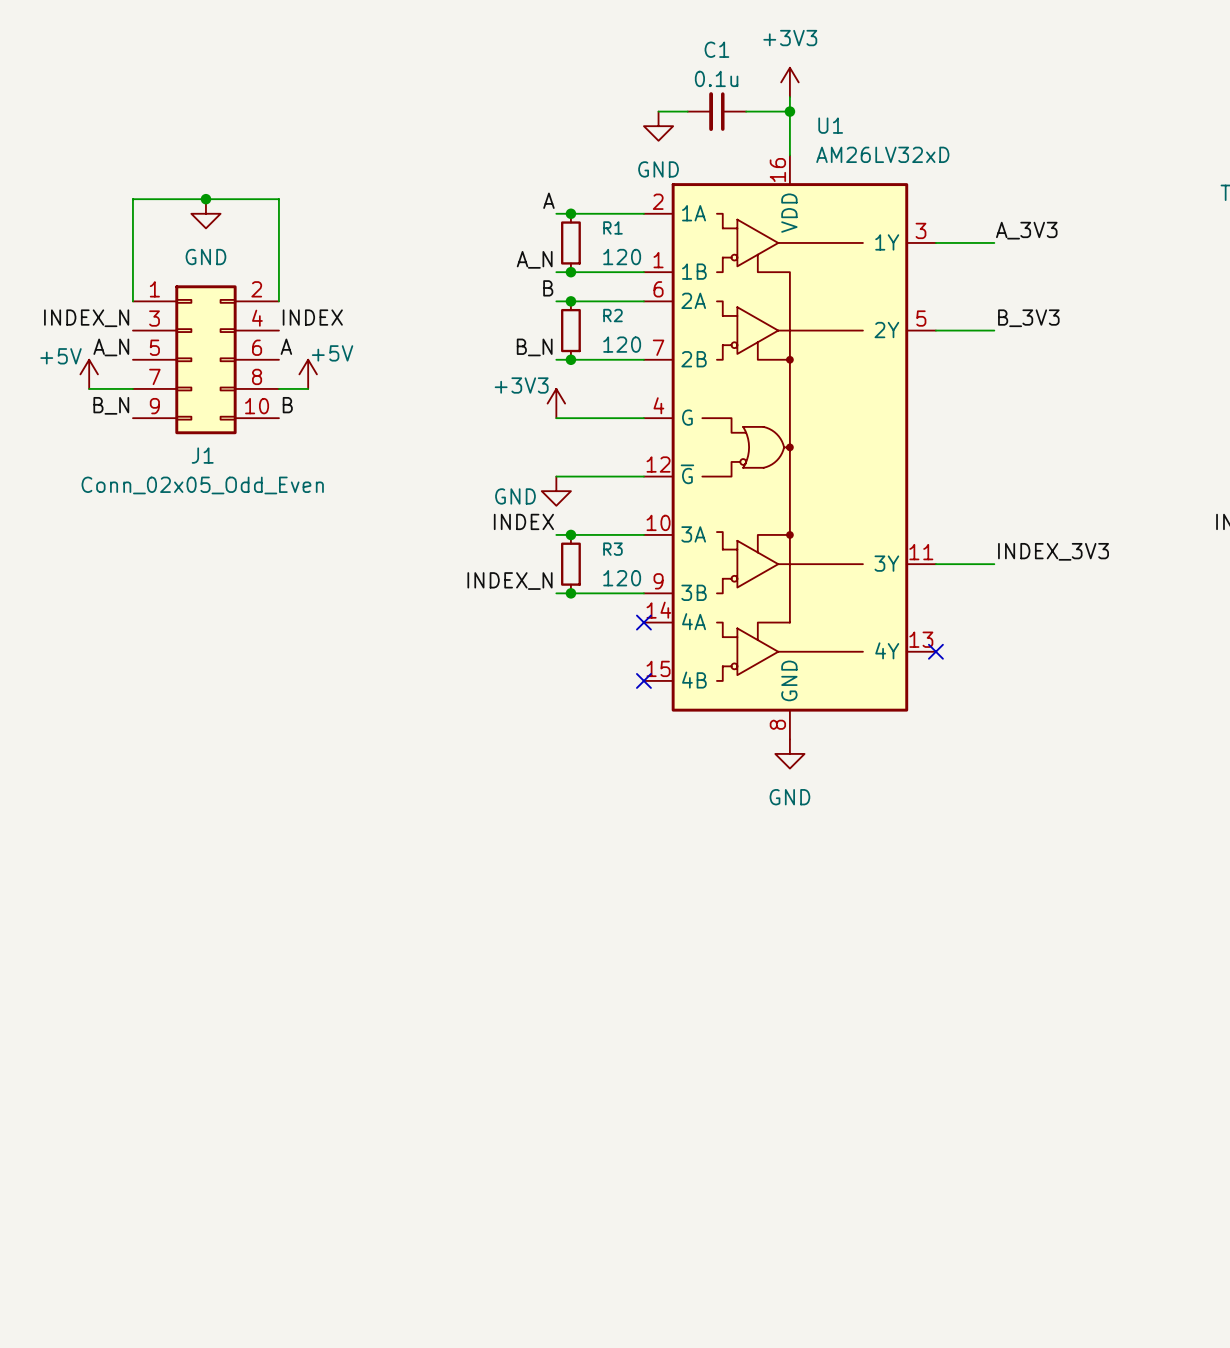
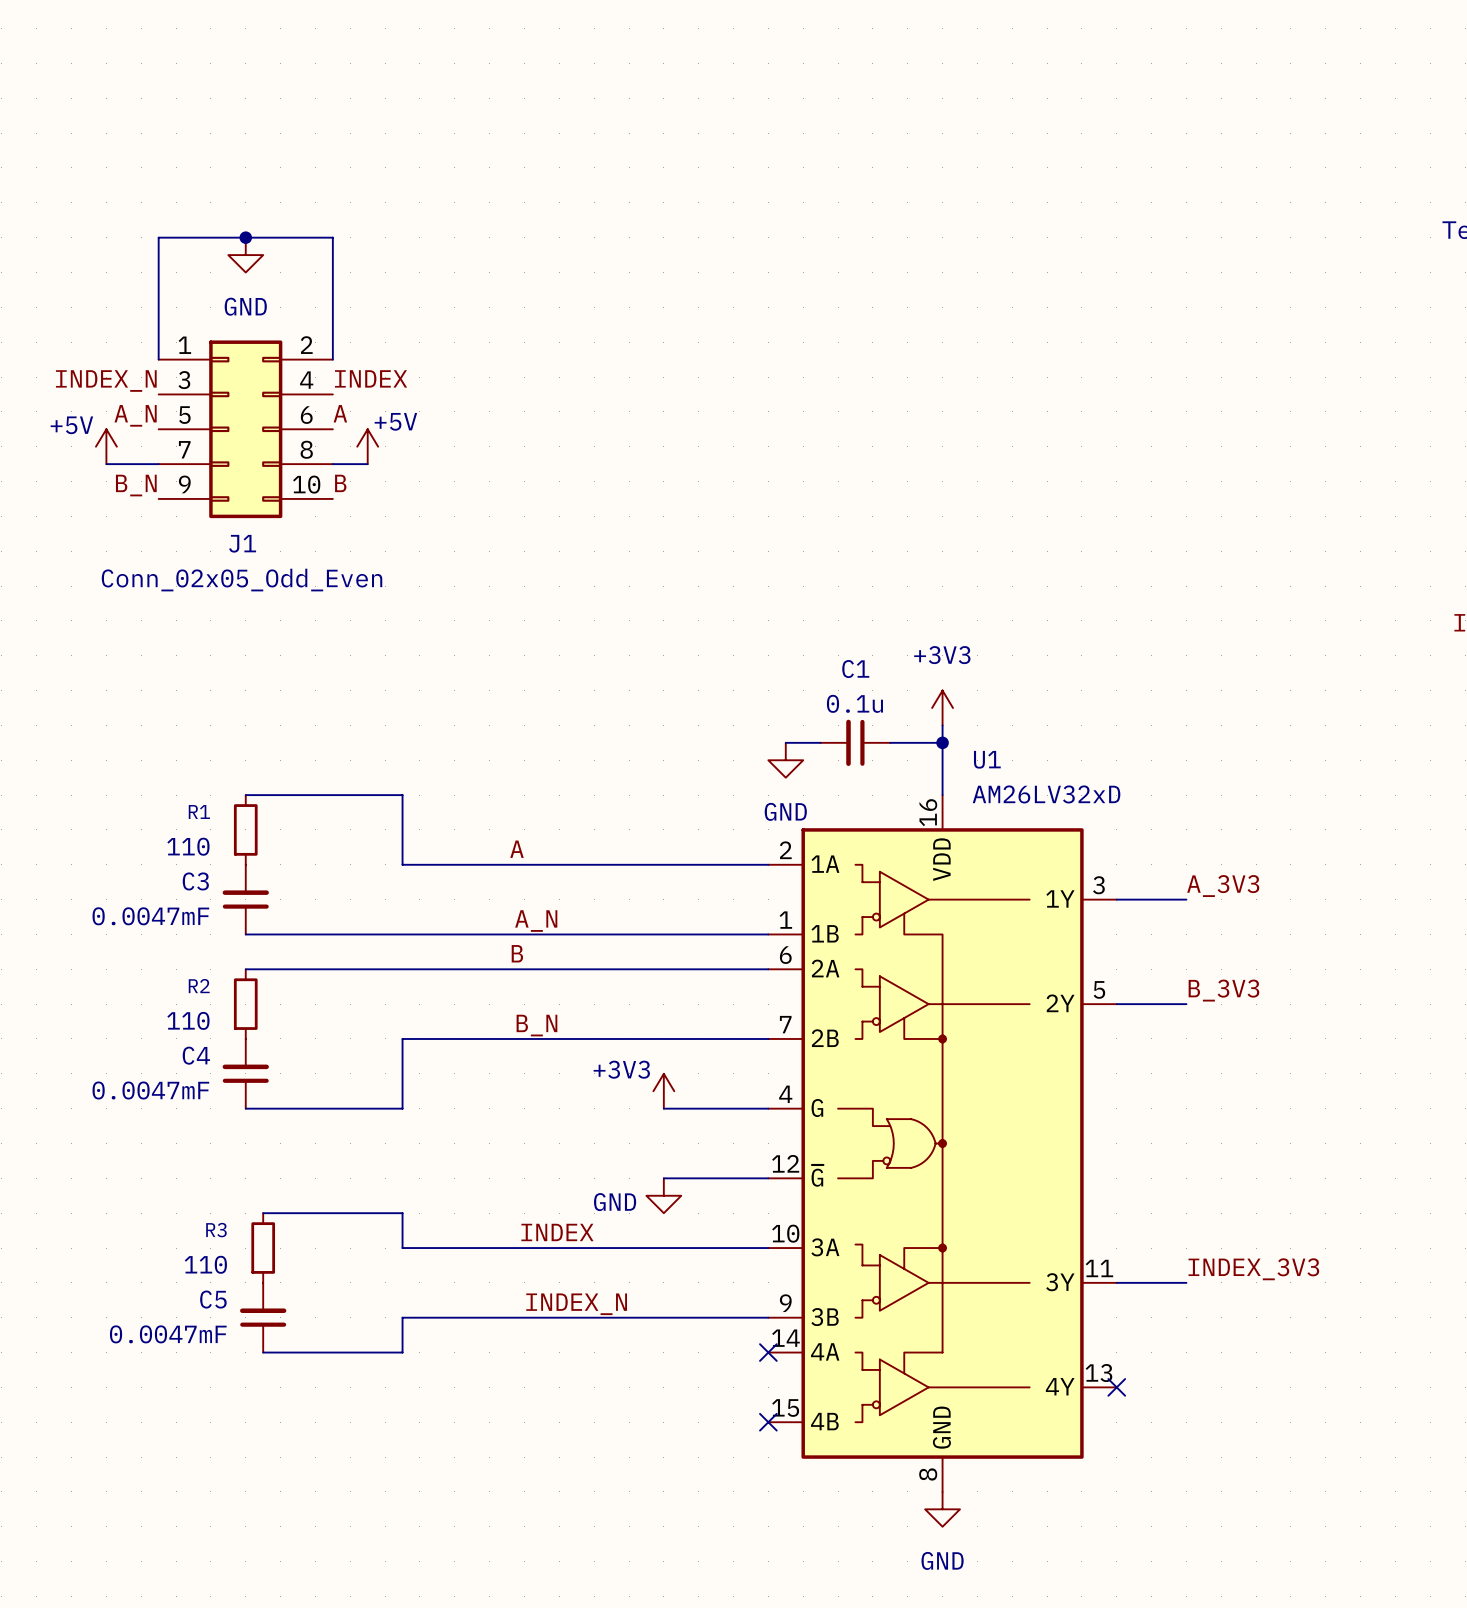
power symbol: +3V3 (789, 82) -> none
wire: (789, 96) (789, 155) -> none
wire: (658, 111) (687, 111) -> none
C1 position: (716, 111) -> (855, 742)
wire: (746, 111) (789, 111) -> none
junction: (789, 111) -> none
power symbol: GND (658, 126) -> none
label: A (548, 200) -> none
wire: (556, 213) (643, 213) -> none
junction: (570, 213) -> none
R1 name position: R1 (612, 227) -> R1 (199, 812)
label: A_3V3 (1026, 230) -> none
R1 position: (570, 242) -> (245, 829)
wire: (935, 242) (994, 242) -> none
R1 value: 120 (622, 257) -> 110 (188, 846)
label: A_N (534, 259) -> none
wire: (556, 272) (643, 272) -> none
junction: (570, 272) -> none
label: B (548, 288) -> none
wire: (556, 301) (643, 301) -> none
junction: (570, 301) -> none
R2 name position: R2 (612, 315) -> R2 (199, 986)
label: B_3V3 (1028, 318) -> none
R2 position: (570, 330) -> (245, 1004)
wire: (935, 330) (994, 330) -> none
R2 value: 120 (622, 344) -> 110 (188, 1020)
label: B_N (534, 347) -> none
wire: (556, 359) (643, 359) -> none
junction: (570, 359) -> none
power symbol: +3V3 (556, 403) -> none
wire: (556, 418) (643, 418) -> none
U1 position: (789, 447) -> (942, 1143)
wire: (556, 476) (643, 476) -> none
power symbol: GND (556, 491) -> none
label: INDEX (523, 521) -> none
wire: (556, 534) (643, 534) -> none
junction: (570, 534) -> none
R3 name position: R3 (612, 549) -> R3 (216, 1230)
label: INDEX_3V3 (1053, 551) -> none
R3 position: (570, 564) -> (263, 1248)
wire: (935, 564) (994, 564) -> (1116, 899) (1186, 899)
R3 value: 120 (622, 578) -> 110 (205, 1264)
label: INDEX_N (510, 581) -> none
wire: (556, 593) (643, 593) -> none
junction: (570, 593) -> none
power symbol: none -> +3V3 (942, 708)
no-connect mark: (643, 622) -> none
junction: none -> (942, 742)
power symbol: none -> GND (785, 760)
no-connect mark: (935, 651) -> none
wire: none -> (245, 795) (402, 795) (402, 864) (768, 864)
no-connect mark: (643, 680) -> none
label: none -> A (517, 849)
label: none -> A_3V3 (1223, 886)
C3: none -> 0.0047mF (245, 899)
power symbol: GND (789, 753) -> none
label: none -> A_N (536, 921)
wire: none -> (245, 934) (768, 934)
label: none -> B (517, 953)
wire: none -> (245, 969) (768, 969)
label: none -> B_3V3 (1223, 990)
wire: none -> (1116, 1004) (1186, 1004)
label: none -> B_N (536, 1025)
wire: none -> (768, 1038) (402, 1038) (402, 1108) (245, 1108)
C4: none -> 0.0047mF (245, 1073)
power symbol: none -> +3V3 (663, 1091)
wire: none -> (663, 1108) (768, 1108)
wire: none -> (663, 1178) (768, 1178)
power symbol: none -> GND (663, 1195)
wire: none -> (263, 1213) (402, 1213) (402, 1248) (768, 1248)
label: none -> INDEX (557, 1232)
label: none -> INDEX_3V3 (1253, 1269)
wire: none -> (1116, 1282) (1186, 1282)
label: none -> INDEX_N (576, 1304)
C5: none -> 0.0047mF (263, 1317)
wire: none -> (768, 1317) (402, 1317) (402, 1352) (263, 1352)
no-connect mark: none -> (768, 1352)
no-connect mark: none -> (1116, 1387)
no-connect mark: none -> (768, 1422)
power symbol: none -> GND (942, 1509)

